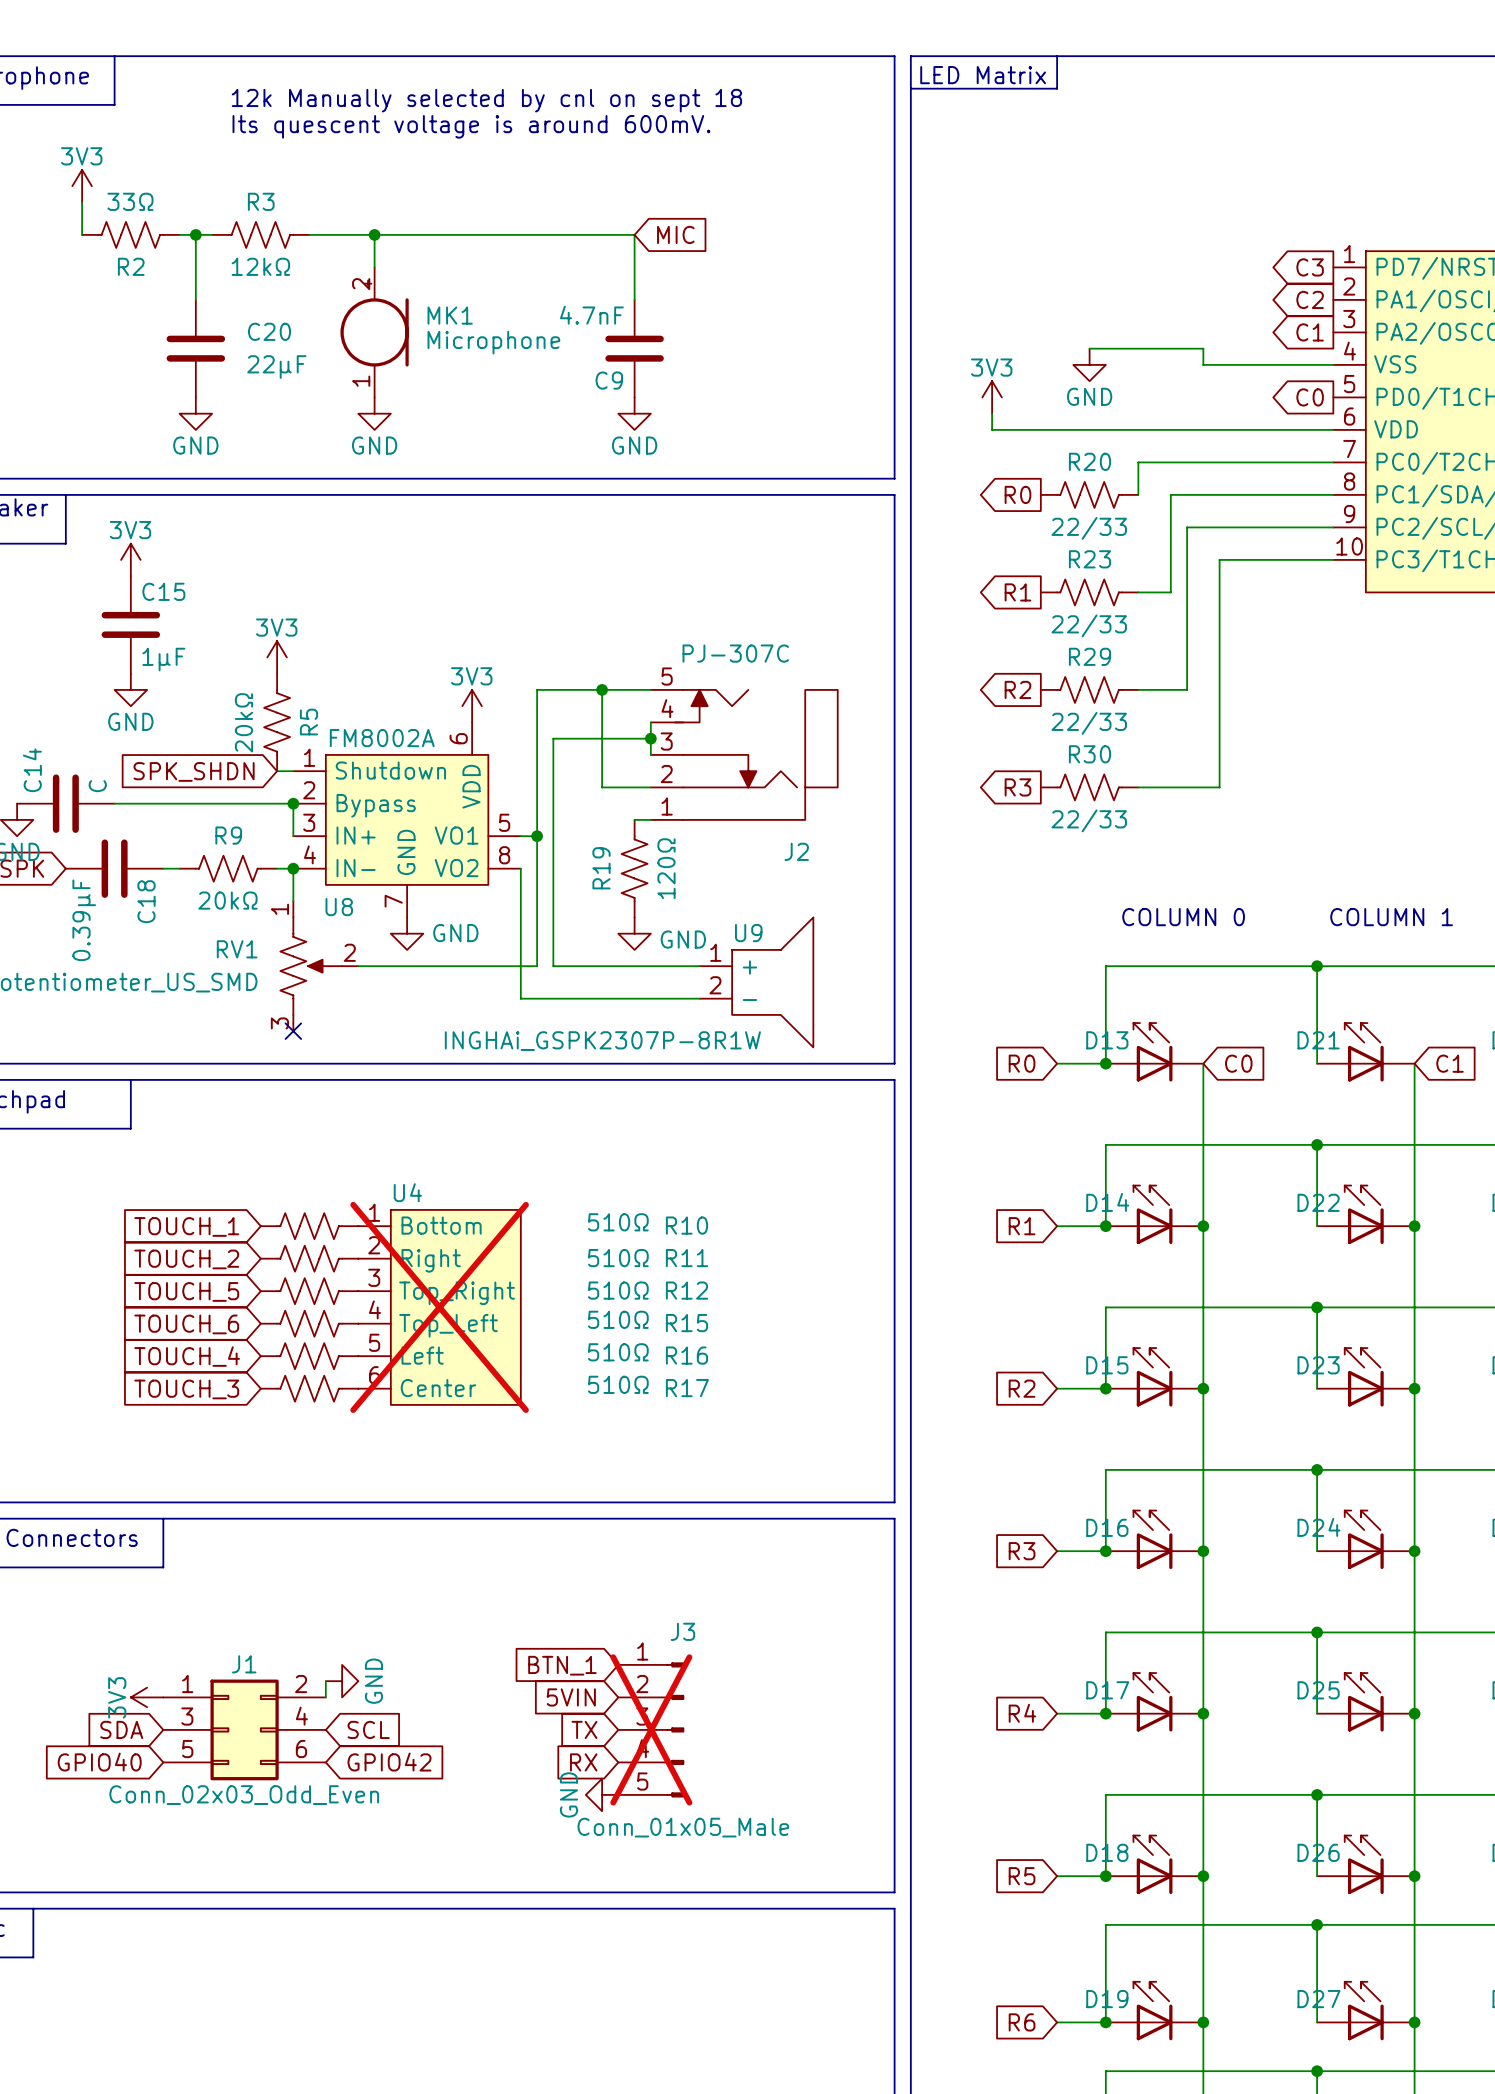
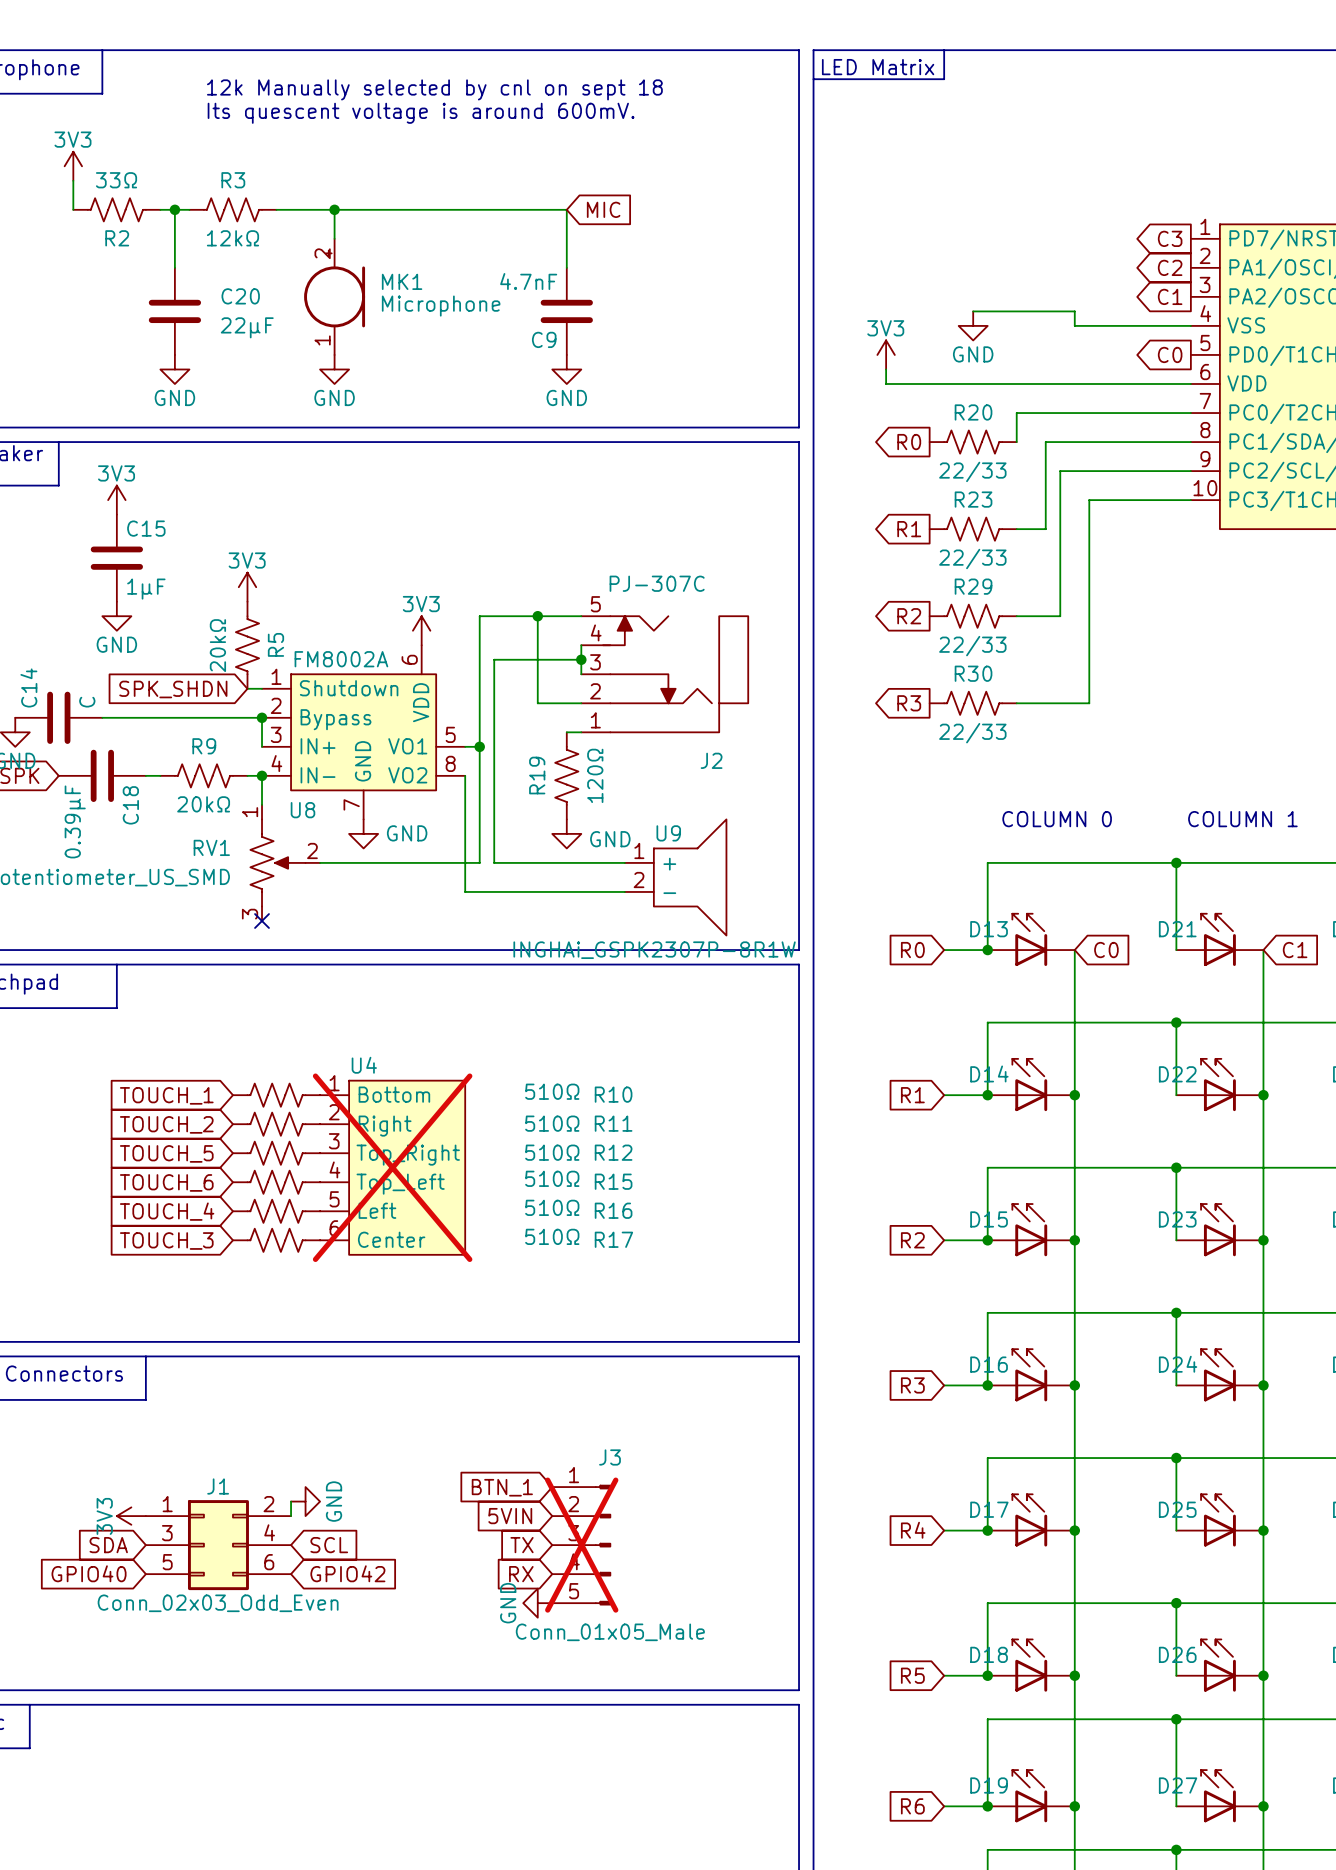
U9 value position: INGHAi_GSPK2307P-8R1W (602, 1041) -> INGHAi_GSPK2307P-8R1W (654, 950)

